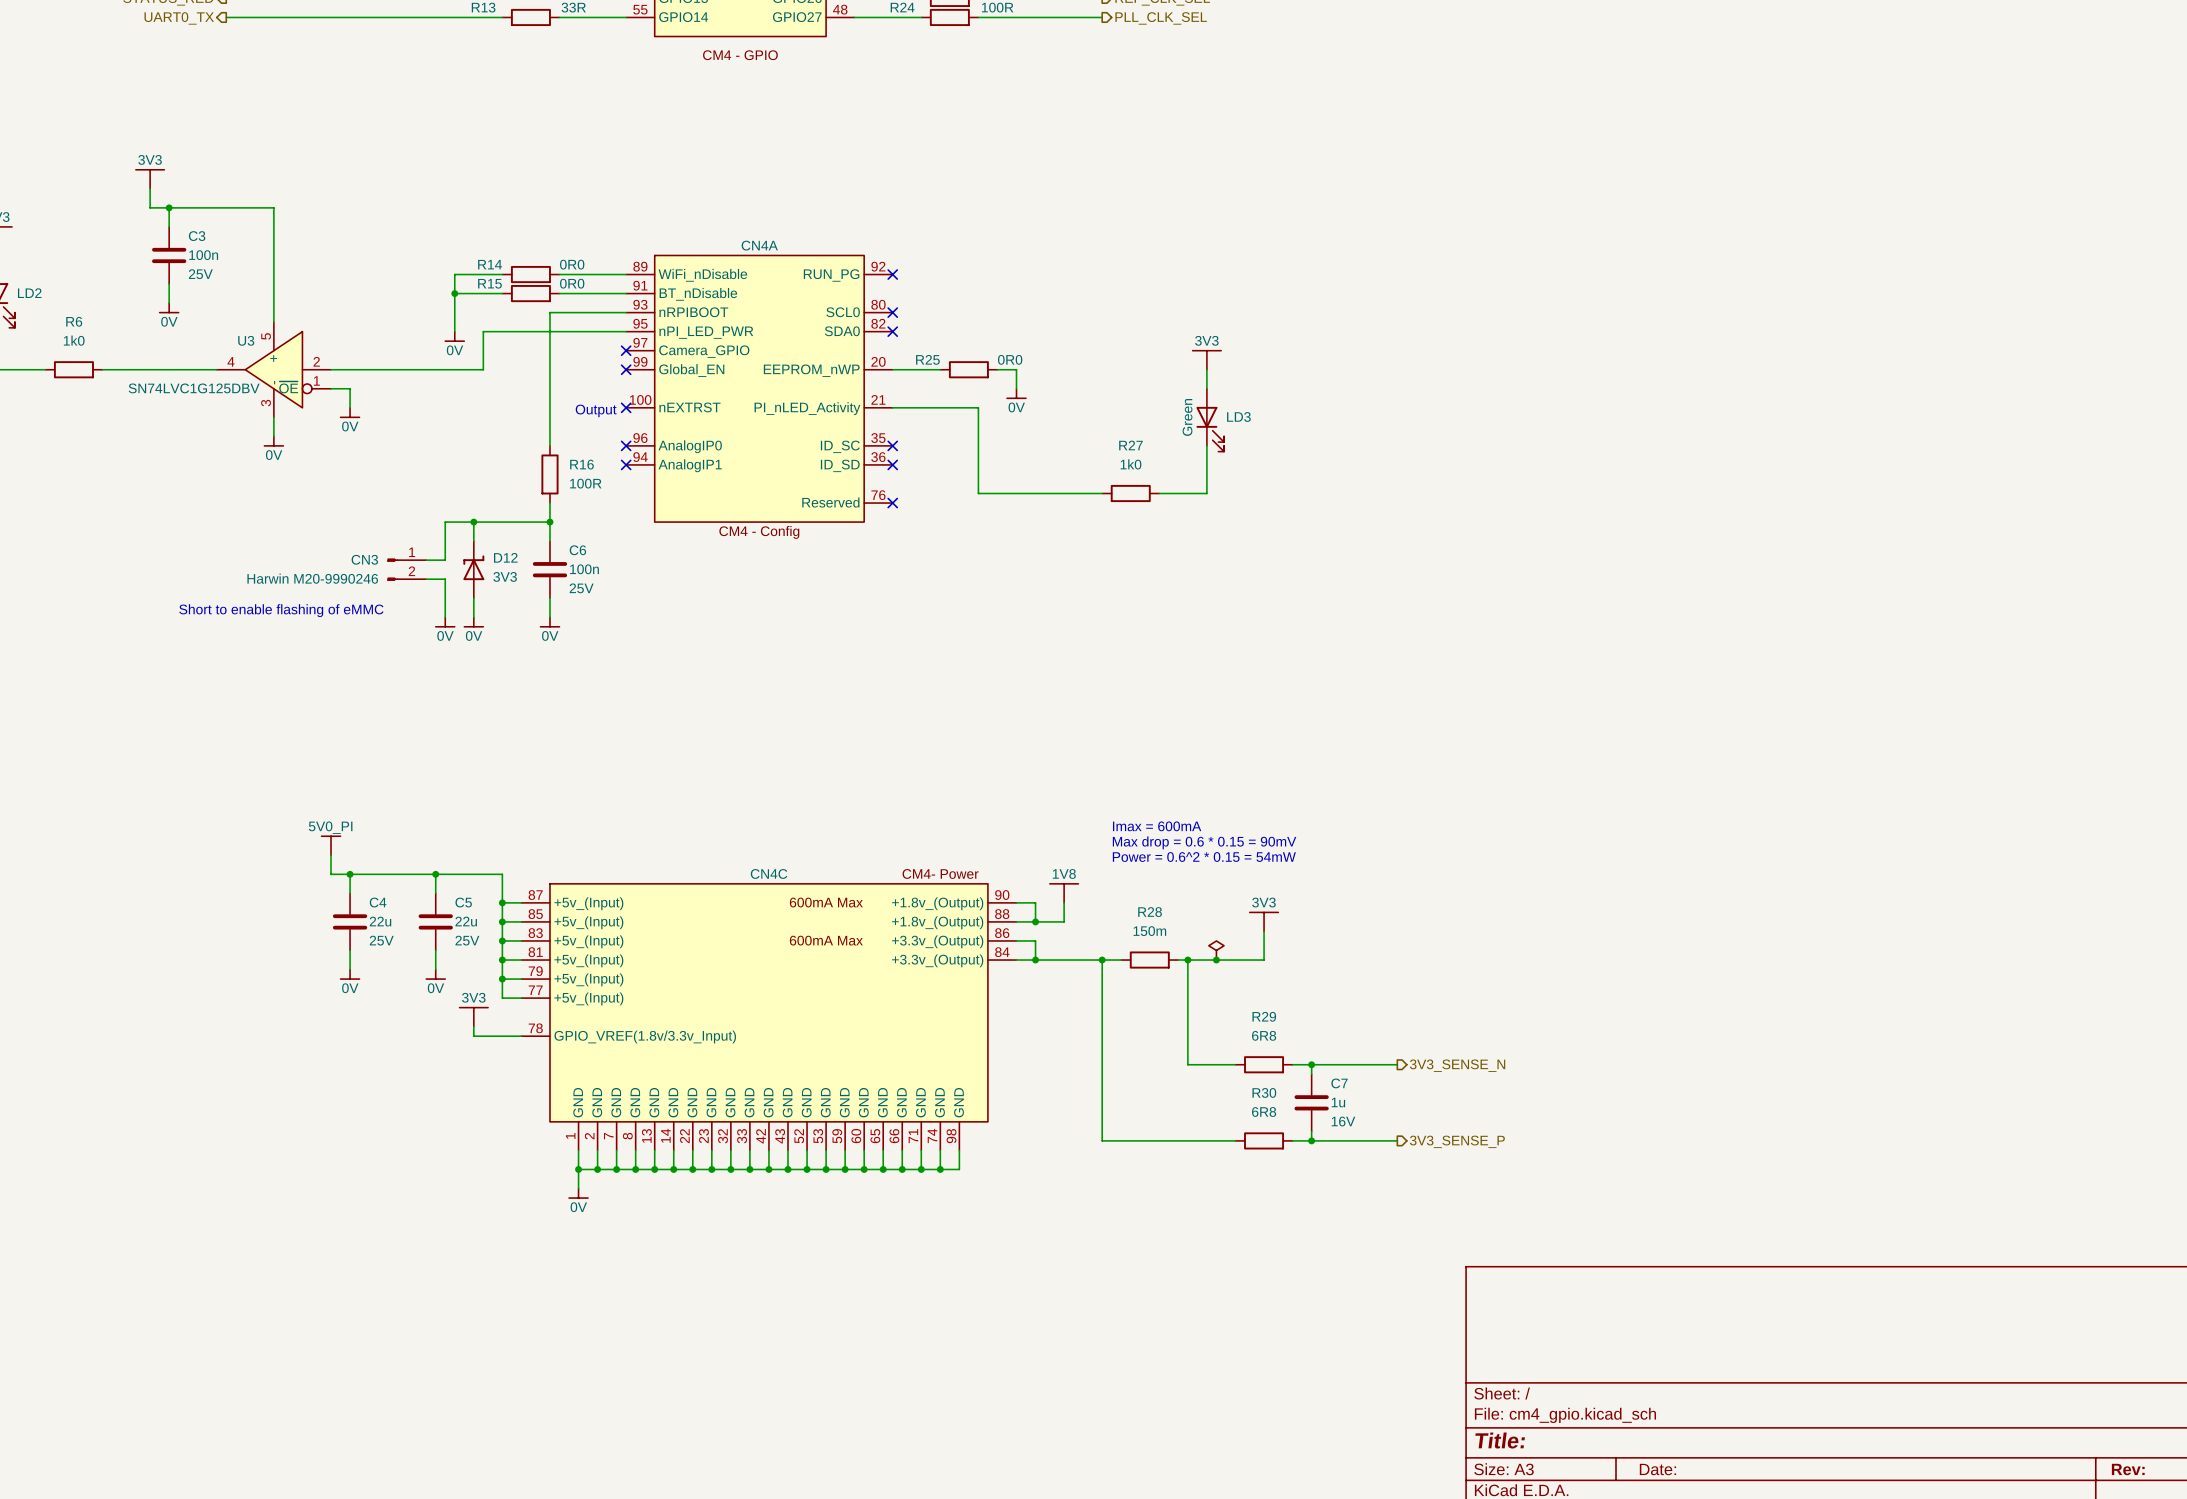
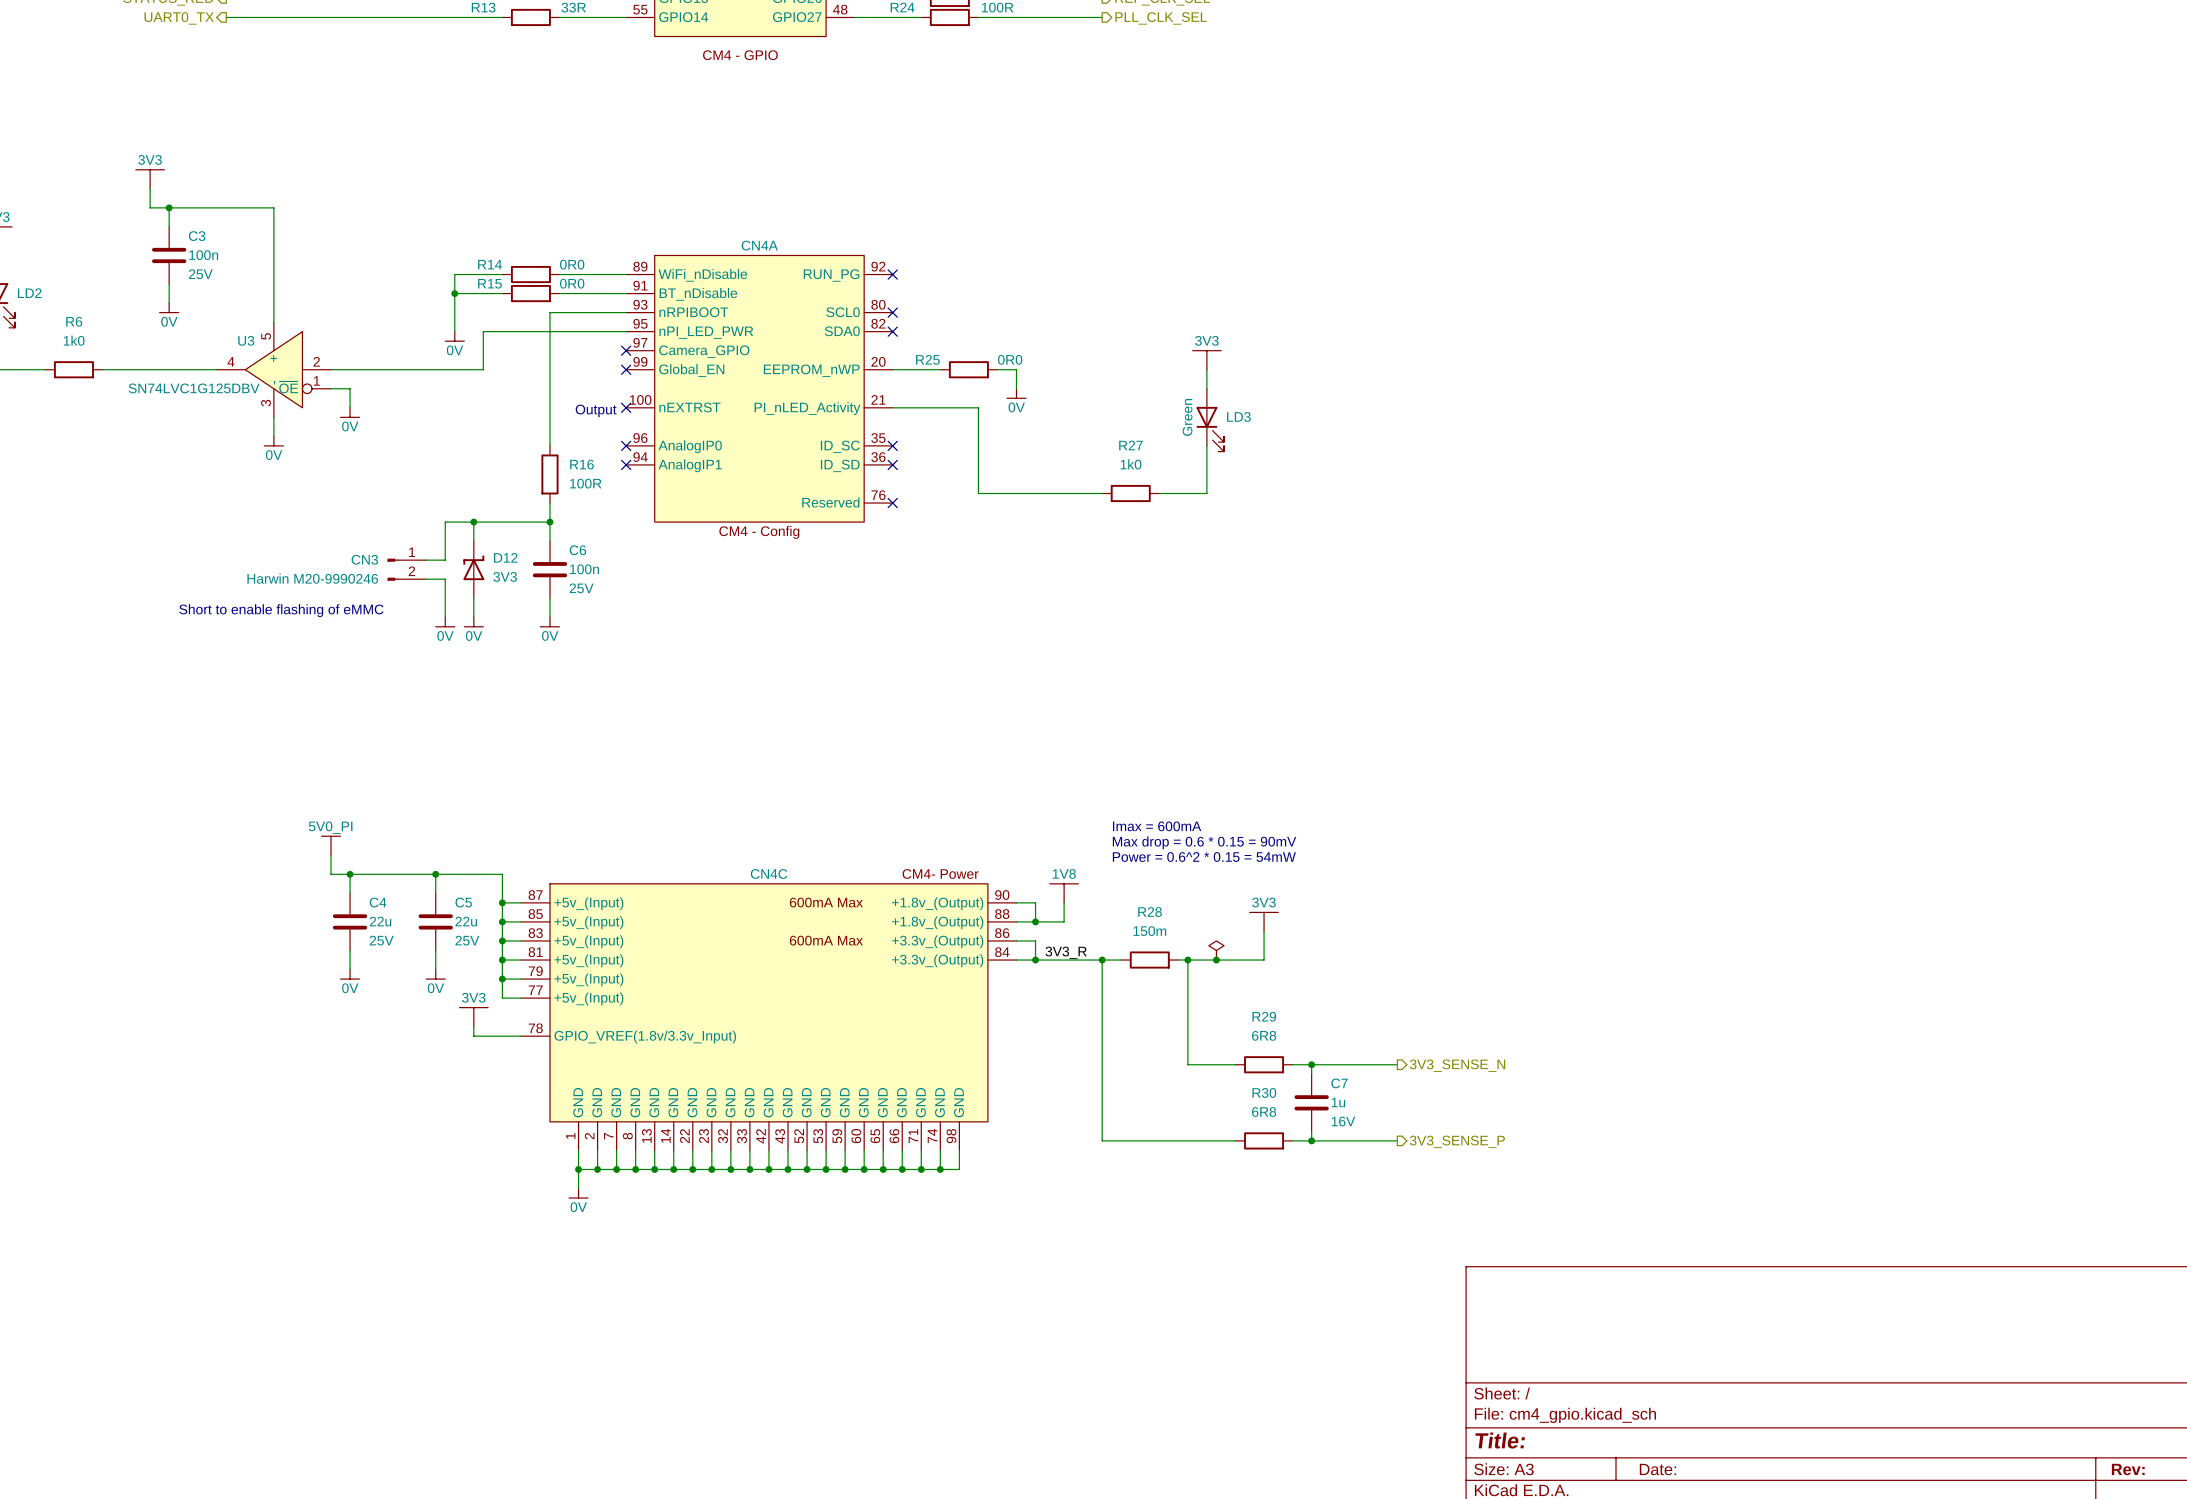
label: none -> 3V3_R (1066, 952)

